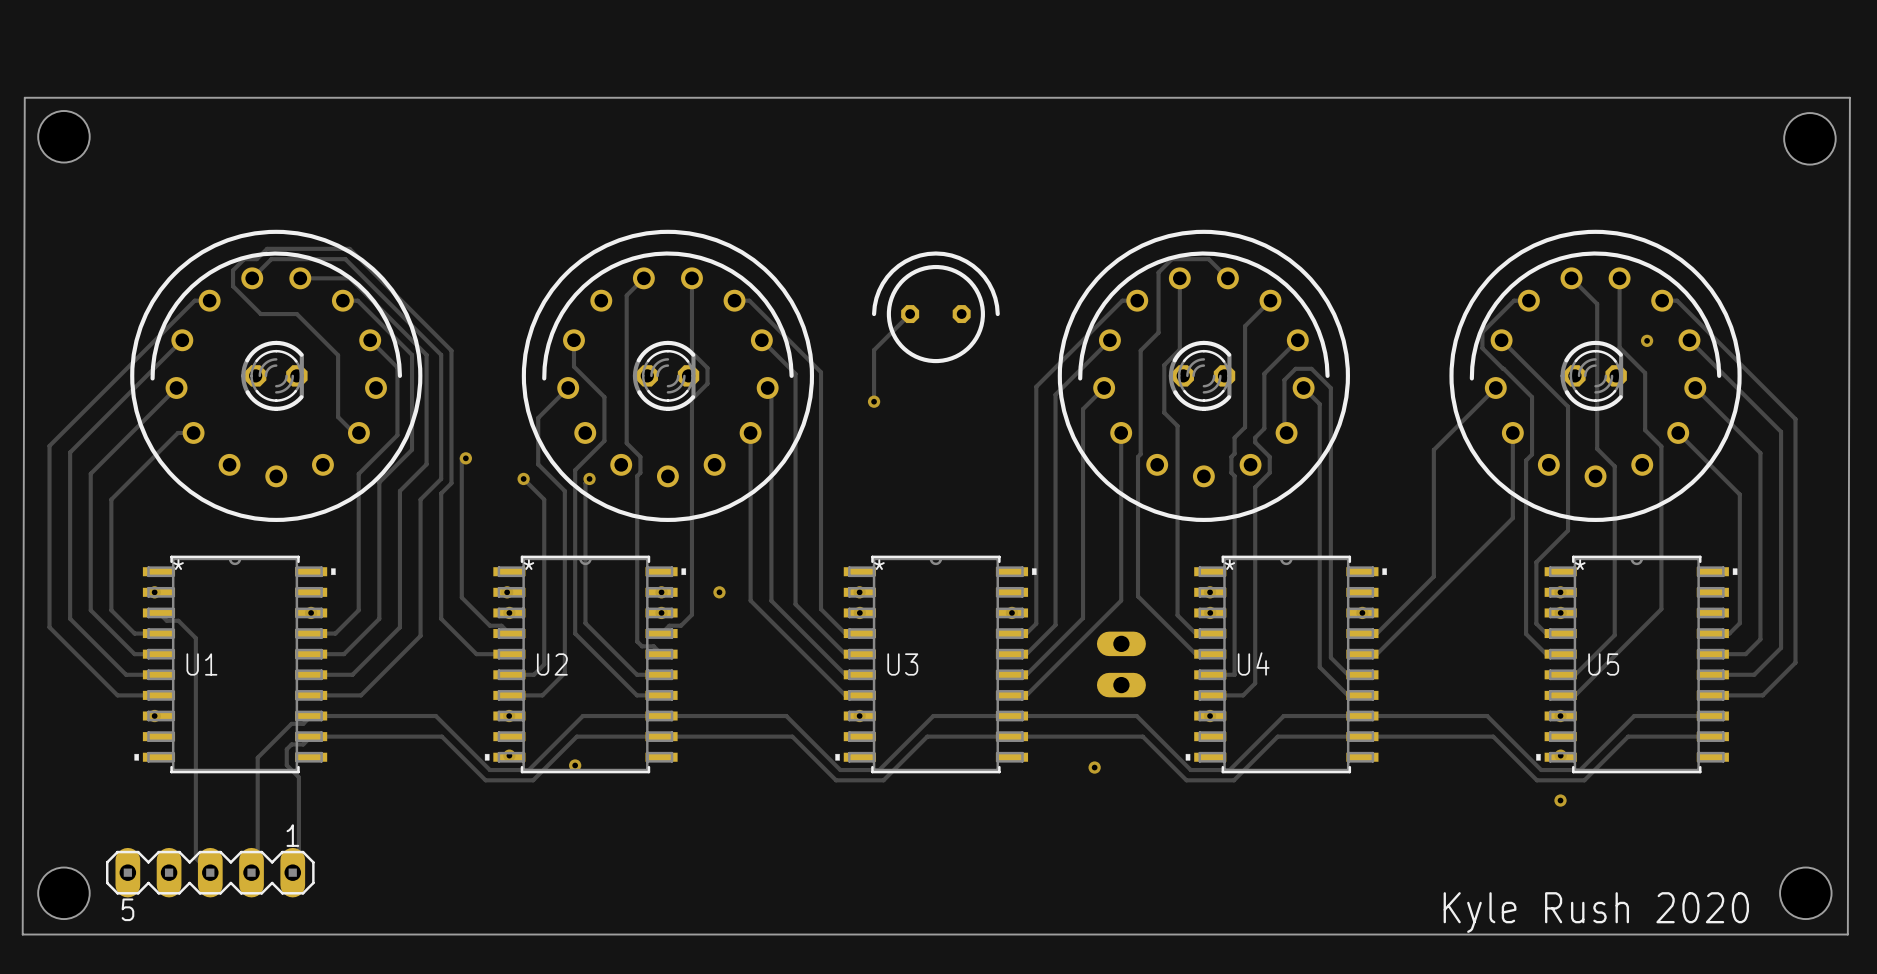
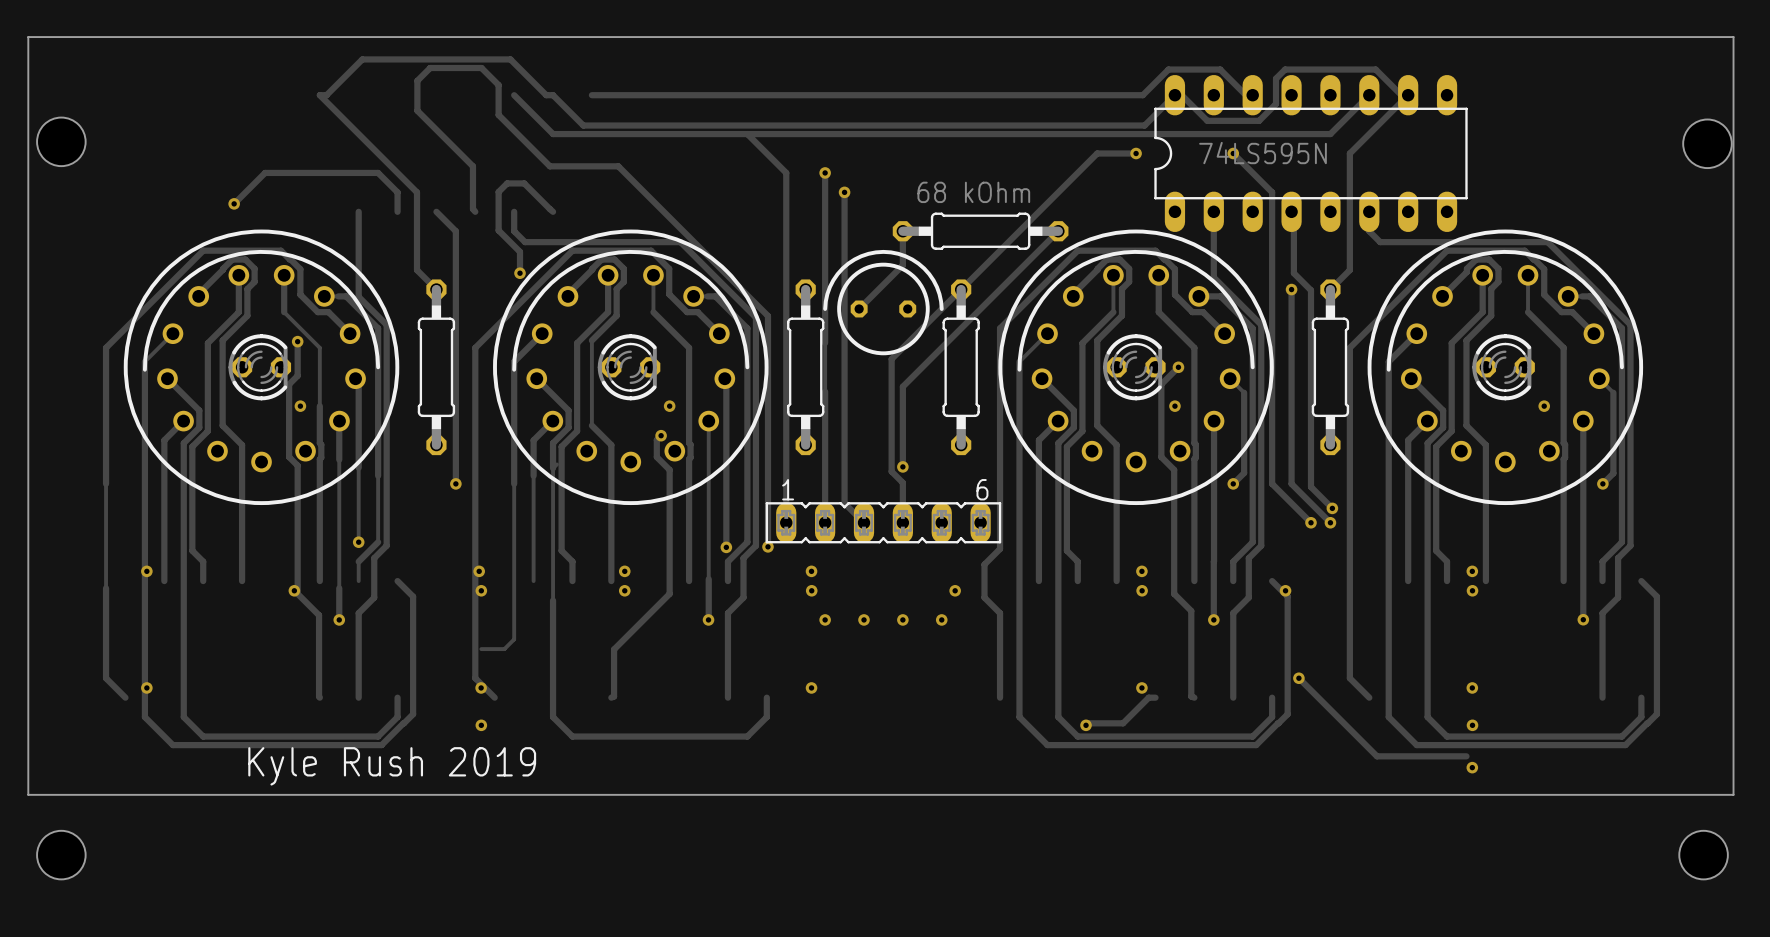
track: none -> (514, 95) (553, 134) (1330, 134) (1369, 95)
track: none -> (591, 95) (1142, 95) (1168, 69) (1220, 69) (1245, 95) (1252, 95)
board edge: (24, 97) (1849, 97) (1847, 934) (22, 934) (24, 97) -> (28, 37) (28, 794) (1733, 794) (1733, 37) (28, 37)
track: none -> (747, 134) (786, 172) (786, 522)
track: none -> (1136, 153) (1097, 153) (891, 359) (891, 471) (902, 482) (902, 522)
via: none -> (1136, 153)
track: none -> (1233, 153) (1272, 192) (1272, 483) (1311, 522)
via: none -> (1233, 153)
part: none -> 74LS595N (1311, 153)
track: none -> (825, 172) (825, 342)
via: none -> (825, 172)
track: none -> (844, 192) (844, 503) (864, 522)
via: none -> (844, 192)
track: none -> (234, 203) (265, 172) (378, 172) (397, 192) (397, 211)
via: none -> (234, 203)
track: none -> (358, 211) (358, 296) (386, 324) (386, 545) (374, 558) (374, 597) (358, 613) (358, 697)
track: none -> (436, 211) (455, 231) (455, 483)
track: none -> (475, 211) (472, 209) (472, 166) (417, 110) (417, 80) (430, 67) (481, 67) (498, 85) (498, 115) (549, 166) (618, 166) (767, 315) (767, 546)
track: none -> (514, 211) (514, 231) (525, 242) (680, 242) (755, 317) (755, 545) (743, 558) (743, 597) (727, 613) (727, 697)
track: none -> (553, 211) (524, 183) (507, 183) (498, 191) (498, 230) (520, 251) (520, 273)
track: none -> (1213, 211) (1213, 277) (1261, 324) (1261, 545) (1248, 558) (1248, 597) (1233, 613) (1233, 697)
track: none -> (1291, 211) (1293, 213) (1293, 273) (1311, 290) (1311, 487) (1332, 508)
track: none -> (1369, 211) (1369, 231) (1380, 242) (1547, 242) (1630, 324) (1630, 545) (1618, 558) (1618, 597) (1602, 613) (1602, 697)
part: none -> 68 kOhm (980, 231)
track: none -> (1058, 231) (902, 386) (902, 466)
via: none -> (520, 273)
track: (252, 278) (271, 259) (345, 259) (441, 354) (441, 478) (420, 499) (420, 635) (361, 695) (311, 695) -> (238, 275) (238, 312) (207, 343) (207, 431) (192, 446) (192, 550) (203, 561) (203, 581)
track: (300, 278) (349, 278) (426, 354) (426, 464) (399, 491) -> (284, 275) (284, 312)
track: (643, 278) (626, 295) (626, 347) -> (567, 296) (567, 294) (601, 259) (614, 259) (623, 268) (623, 281) (616, 289) (616, 315) (591, 340)
track: none -> (608, 275) (608, 312) (577, 343) (577, 431) (561, 446) (561, 550) (572, 561) (572, 581)
track: (1227, 278) (1208, 259) (1171, 259) (1158, 272) (1158, 332) (1140, 350) (1140, 454) (1138, 456) (1138, 596) (1195, 654) (1210, 654) -> (1158, 275) (1158, 312) (1194, 347) (1194, 581)
track: (1571, 278) (1597, 304) (1597, 448) (1614, 466) (1614, 635) (1575, 674) (1560, 674) -> (1482, 275) (1482, 312) (1451, 343) (1451, 431) (1436, 446) (1436, 550) (1447, 561) (1447, 581)
track: none -> (436, 289) (417, 270) (417, 192) (319, 95) (326, 95) (362, 59) (510, 59) (546, 95) (553, 95) (583, 125) (1144, 125) (1174, 95) (1181, 95) (1207, 120) (1259, 120) (1276, 103) (1276, 78) (1285, 69) (1375, 69) (1401, 95) (1408, 95) (1349, 153) (1349, 270) (1330, 289)
track: none -> (1291, 289) (1291, 483) (1330, 522)
via: none -> (1291, 289)
track: (209, 300) (194, 300) (49, 445) (49, 627) (117, 695) (158, 695) -> (198, 296) (198, 294) (232, 259) (245, 259) (254, 268) (254, 281) (247, 289) (247, 315) (222, 340) (222, 425) (242, 445) (242, 581)
track: (357, 300) (412, 354) (412, 449) (379, 482) -> (338, 296) (346, 296) (378, 328) (378, 475)
track: (749, 300) (821, 372) (821, 609) (845, 633) (859, 633) -> (707, 296) (715, 296) (747, 328) (747, 542) (727, 561) (727, 581)
track: (1137, 300) (1122, 300) (1036, 386) (1036, 623) (1026, 633) (1011, 633) -> (1073, 296) (1073, 294) (1106, 259) (1119, 259) (1129, 268) (1129, 281) (1121, 289) (1121, 315) (1097, 340) (1097, 425) (1116, 445) (1116, 581)
track: (1270, 300) (1245, 326) (1245, 427) (1234, 437) (1234, 453) (1231, 456) (1231, 472) (1234, 476) (1234, 674) (1210, 674) -> (1198, 296) (1220, 296) (1252, 328) (1252, 542) (1233, 561) (1233, 581)
track: (1528, 300) (1514, 300) (1482, 332) (1482, 348) (1532, 397) (1532, 454) (1526, 460) (1526, 634) (1546, 654) (1560, 654) -> (1442, 296) (1466, 271) (1466, 268) (1476, 259) (1489, 259) (1498, 268) (1498, 281) (1491, 289) (1491, 315) (1466, 340) (1466, 425) (1485, 445) (1485, 581)
track: (1677, 300) (1795, 419) (1795, 662) (1762, 695) (1712, 695) -> (1582, 296) (1589, 296) (1621, 328) (1621, 542) (1602, 561) (1602, 581)
track: (910, 314) (874, 350) -> (859, 308) (902, 265) (902, 231)
track: (300, 317) (296, 314) (260, 314) (233, 286) (233, 270) (244, 259) (256, 259) (267, 248) (349, 248) (451, 350) (451, 483) (441, 493) (441, 618) (476, 654) (509, 654) -> none
track: (691, 317) (691, 352) (707, 368) (707, 383) (691, 399) (691, 614) (681, 625) (669, 625) (661, 633) -> (653, 312) (689, 347) (689, 581)
track: (1179, 317) (1179, 349) (1164, 365) (1164, 412) (1177, 425) (1177, 615) (1195, 633) (1210, 633) -> (1113, 312) (1082, 343) (1082, 431) (1066, 446) (1066, 550) (1077, 561) (1077, 581)
track: (1619, 317) (1619, 347) (1645, 373) (1645, 430) (1661, 446) (1661, 609) (1575, 695) (1560, 695) -> (1528, 312) (1563, 347) (1563, 581)
track: (370, 340) (397, 367) (397, 435) (358, 473) -> (350, 333) (328, 312) (317, 312) (300, 294) (300, 269) (280, 250) (203, 250) (106, 347) (106, 483)
track: (573, 340) (573, 366) (604, 397) (604, 440) (575, 470) (575, 633) (637, 695) (661, 695) -> none
track: (761, 340) (795, 373) (795, 604) (845, 654) (859, 654) -> (719, 333) (697, 312) (687, 312) (669, 294) (669, 268) (651, 250) (572, 250) (475, 347) (475, 678) (494, 697)
track: (1297, 340) (1264, 373) (1264, 428) (1255, 437) (1255, 442) (1269, 456) (1269, 472) (1255, 487) (1255, 683) (1243, 695) (1210, 695) -> (1224, 333) (1203, 312) (1192, 312) (1174, 294) (1174, 269) (1155, 250) (1077, 250) (1000, 328) (1000, 548) (984, 564) (984, 597) (1000, 613) (1000, 697)
track: (1501, 340) (1568, 406) (1568, 530) (1536, 562) (1536, 623) (1546, 633) (1560, 633) -> (1416, 333) (1388, 361) (1388, 717) (1416, 745) (1625, 745) (1656, 714) (1656, 596) (1641, 581)
via position: (1647, 340) -> (1544, 406)
track: (1689, 340) (1781, 431) (1781, 647) (1754, 674) (1712, 674) -> (1593, 333) (1572, 312) (1561, 312) (1544, 294) (1544, 269) (1524, 250) (1447, 250) (1349, 347) (1349, 678) (1369, 697)
track: none -> (297, 341) (297, 375) (289, 384) (289, 457) (297, 465) (297, 593) (319, 615) (319, 697)
via: none -> (297, 341)
track: (152, 370) (70, 452) (70, 618) (126, 674) (158, 674) -> (144, 361) (144, 717) (172, 745) (381, 745) (413, 714) (413, 596) (397, 581)
track: (1080, 370) (1055, 394) (1055, 625) (1026, 654) (1011, 654) -> (1019, 361) (1019, 717) (1047, 745) (1256, 745) (1287, 714) (1287, 596) (1272, 581)
part: none -> (436, 367)
part: none -> (805, 367)
part: none -> (961, 367)
track: none -> (1178, 367) (1161, 384) (1161, 457) (1174, 469) (1174, 593) (1191, 611) (1191, 696) (1194, 697)
via: none -> (1178, 367)
part: none -> (1330, 367)
track: (176, 388) (90, 473) (90, 610) (134, 654) (158, 654) -> (167, 378) (199, 410) (199, 427) (183, 443) (183, 717) (203, 736) (378, 736) (397, 717) (397, 697)
track: none -> (355, 378) (358, 381) (358, 467)
track: (568, 388) (538, 417) (538, 464) (564, 491) -> (536, 378) (568, 410) (568, 427) (553, 443) (553, 468)
track: (1104, 388) (1083, 409) (1083, 618) (1026, 674) (1011, 674) -> (1042, 378) (1073, 410) (1073, 427) (1058, 443) (1058, 717) (1077, 736) (1252, 736) (1272, 717) (1272, 697)
track: (1495, 388) (1433, 449) (1433, 576) (1376, 633) (1362, 633) -> (1411, 378) (1443, 410) (1443, 427) (1427, 443) (1427, 717) (1447, 736) (1621, 736) (1641, 717) (1641, 697)
track: (769, 389) (771, 391) (771, 600) (845, 674) (859, 674) -> (726, 380) (726, 547)
track: none -> (825, 391) (825, 522)
via: (874, 401) -> none
track: (1318, 402) (1319, 667) (1347, 695) (1362, 695) -> (1244, 392) (1244, 473) (1233, 483)
track: (1710, 402) (1760, 453) (1760, 639) (1745, 654) (1712, 654) -> (1613, 392) (1613, 473) (1602, 483)
via: none -> (300, 406)
track: (338, 417) (353, 432) (358, 432) -> (339, 459) (339, 421)
track: none -> (319, 406) (319, 581)
via: none -> (669, 406)
via: none -> (1174, 406)
track: (193, 432) (177, 432) (111, 499) -> (183, 421) (164, 440) (164, 581)
track: none -> (552, 421) (533, 440) (533, 475)
track: (1121, 432) (1121, 600) (1026, 695) (1011, 695) -> (1058, 421) (1038, 440) (1038, 581)
track: (1286, 432) (1284, 430) (1284, 380) (1295, 368) (1311, 368) (1330, 388) (1330, 657) (1347, 674) (1362, 674) -> (1214, 421) (1213, 619)
track: (1512, 432) (1512, 518) (1376, 654) (1362, 654) -> (1427, 421) (1408, 440) (1408, 581)
track: (1678, 432) (1739, 494) (1739, 623) (1729, 633) (1712, 633) -> (1583, 421) (1583, 619)
track: (626, 437) (626, 443) (640, 456) (640, 472) (637, 476) (637, 641) (642, 646) (653, 646) (661, 654) -> (591, 425) (611, 445) (611, 581)
track: none -> (661, 435) (656, 439) (656, 457) (669, 469) (669, 593) (614, 649) (614, 696) (611, 697)
via: none -> (661, 435)
track: (465, 458) (461, 458) (461, 597) (489, 625) (501, 625) (509, 633) -> none
via: (465, 458) -> none
track: (523, 478) (544, 499) -> (542, 333) (514, 361) (514, 483)
via: (523, 478) -> none
via: (589, 478) -> none
via: none -> (902, 466)
via: none -> (455, 483)
via: none -> (1233, 483)
via: none -> (1602, 483)
via: none -> (1332, 508)
part: none -> (883, 522)
via: none -> (1311, 522)
via: none -> (1330, 522)
track: (379, 561) (379, 582) -> (378, 542) (358, 561)
via: none -> (358, 542)
track: (399, 561) (399, 627) (352, 674) (311, 674) -> none
via: none -> (726, 547)
via: none -> (767, 546)
via: (719, 592) -> none
track: (750, 600) (845, 695) (859, 695) -> (708, 579) (708, 619)
track: (379, 602) (379, 618) (343, 654) (311, 654) -> none
track: (564, 602) (564, 673) (542, 695) (509, 695) -> none
track: (111, 610) (134, 633) (158, 633) -> (106, 588) (106, 678) (125, 697)
track: (358, 610) (335, 633) (311, 633) -> (339, 588) (339, 619)
track: (158, 612) (166, 620) (178, 620) (195, 638) (195, 858) (210, 872) -> none
track: (585, 623) (637, 674) (661, 674) -> (553, 600) (553, 717) (572, 736) (747, 736) (766, 717) (766, 697)
via: none -> (339, 619)
via: none -> (708, 619)
via: none -> (825, 619)
via: none -> (864, 619)
via: none -> (902, 619)
via: none -> (941, 619)
via: none -> (1213, 619)
via: none -> (1583, 619)
U1: (235, 664) -> none
U2: (585, 664) -> none
U3: (935, 664) -> none
part: (1121, 664) -> none
U4: (1286, 664) -> none
U5: (1636, 664) -> none
track: none -> (1298, 678) (1376, 756) (1466, 756)
via: none -> (1298, 678)
track: (1712, 716) (1634, 716) (1580, 770) (1541, 770) (1487, 716) (1283, 716) (1229, 770) (1190, 770) (1136, 716) (933, 716) (879, 770) (840, 770) (786, 716) (582, 716) (528, 770) (489, 770) (435, 716) (311, 716) (303, 723) (291, 723) (257, 757) (257, 866) (251, 872) -> none
track: none -> (1155, 697) (1148, 697) (1123, 723) (1088, 723) (1086, 725)
track: (1712, 736) (1628, 736) (1584, 780) (1536, 780) (1493, 736) (1277, 736) (1234, 780) (1186, 780) (1142, 736) (927, 736) (883, 780) (836, 780) (792, 736) (576, 736) (533, 780) (485, 780) (441, 736) (311, 736) (303, 744) (291, 744) (286, 749) (286, 765) (298, 777) (298, 866) (292, 872) -> none
via: (575, 765) -> none
via position: (1094, 767) -> (1086, 725)
text: none -> Kyle Rush 2019 (392, 766)
part: (210, 872) -> none
text: Kyle Rush 2020 (1596, 912) -> none

